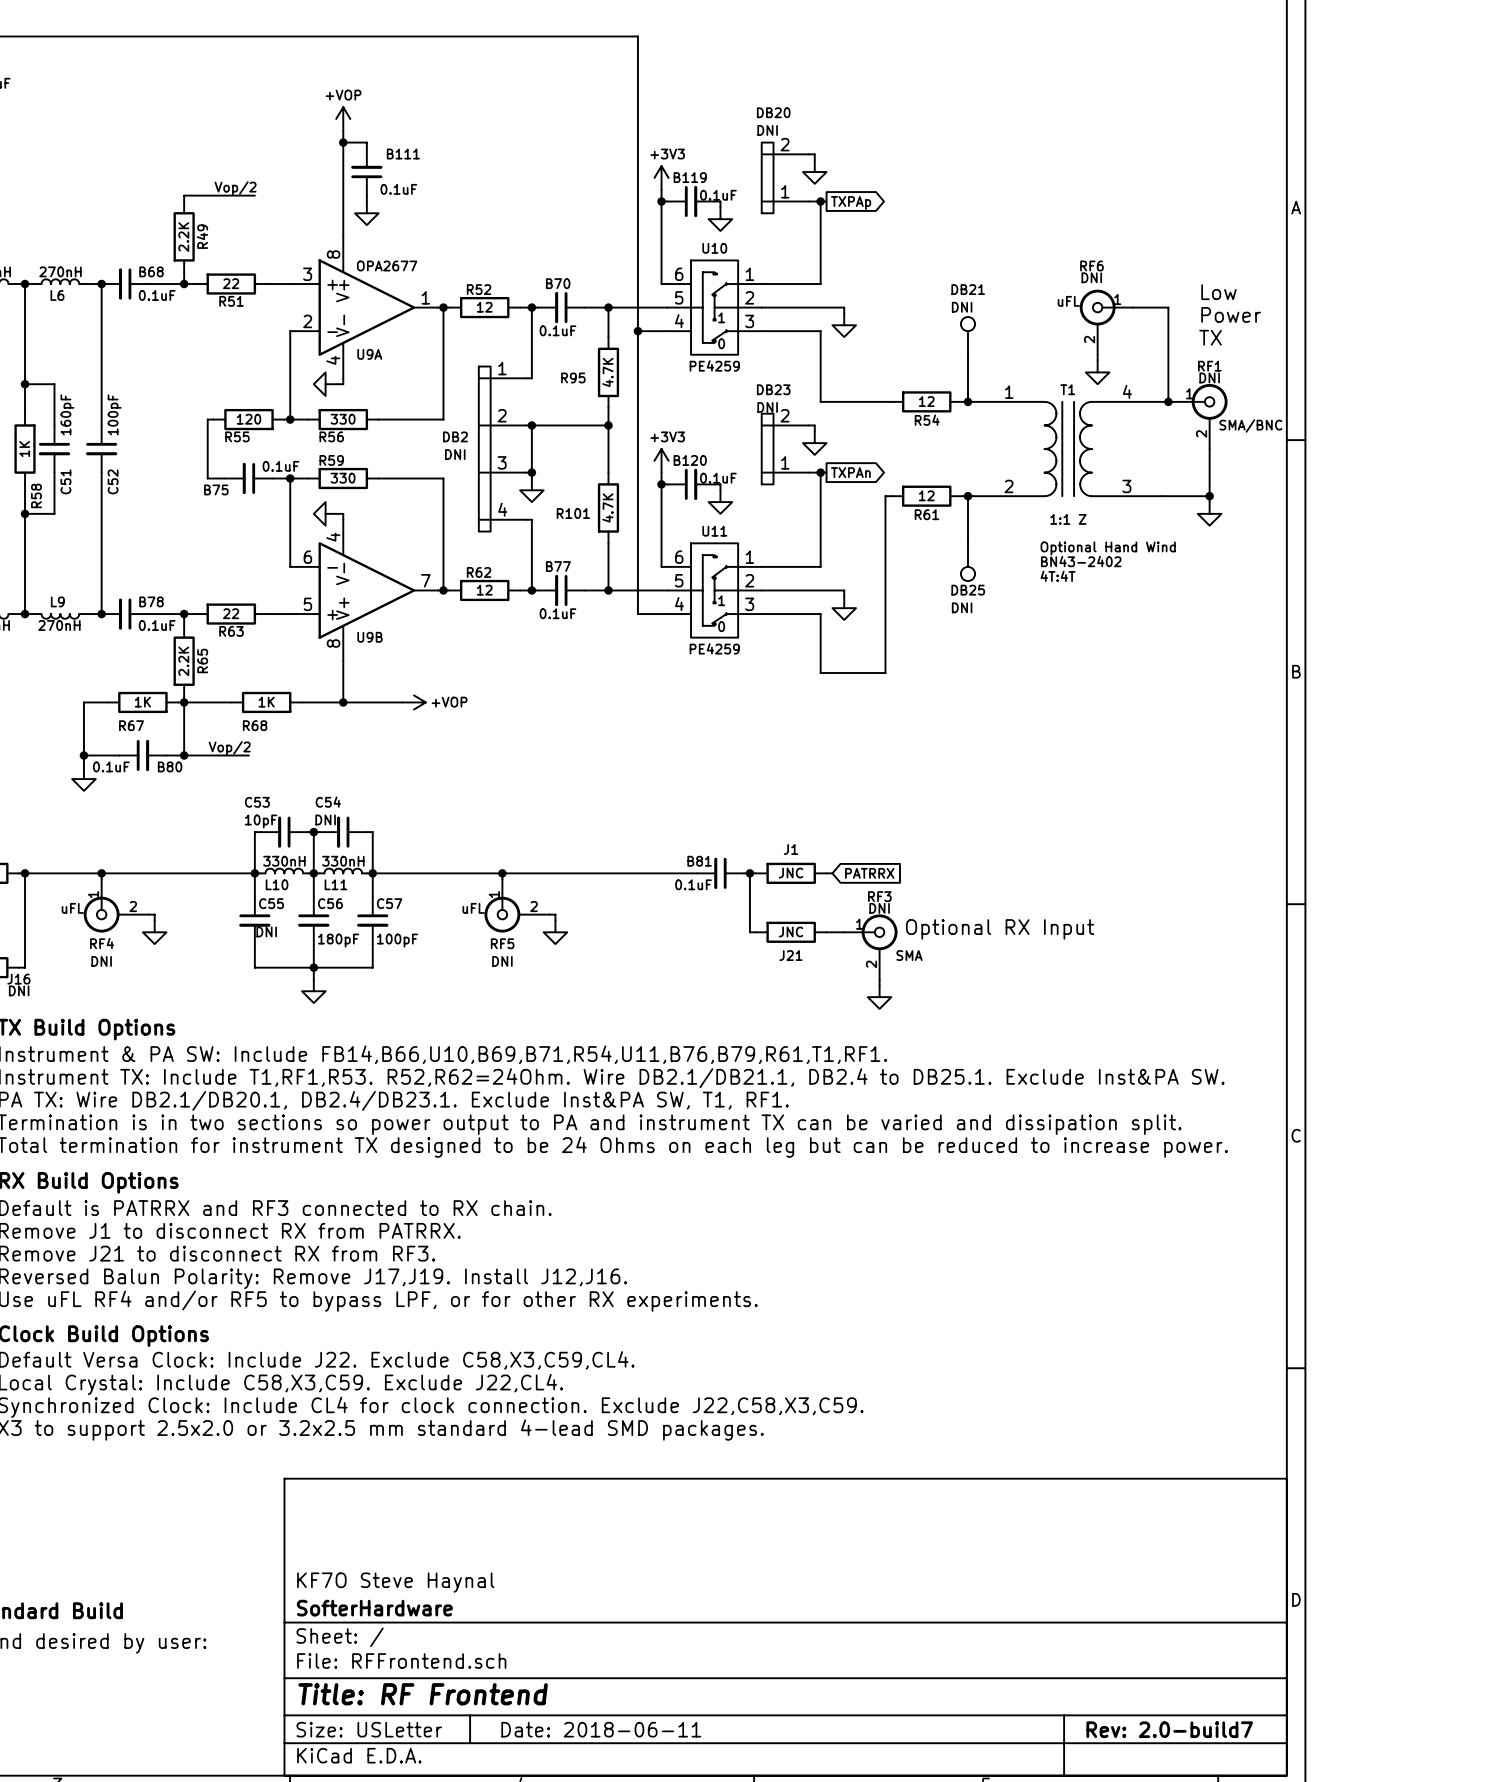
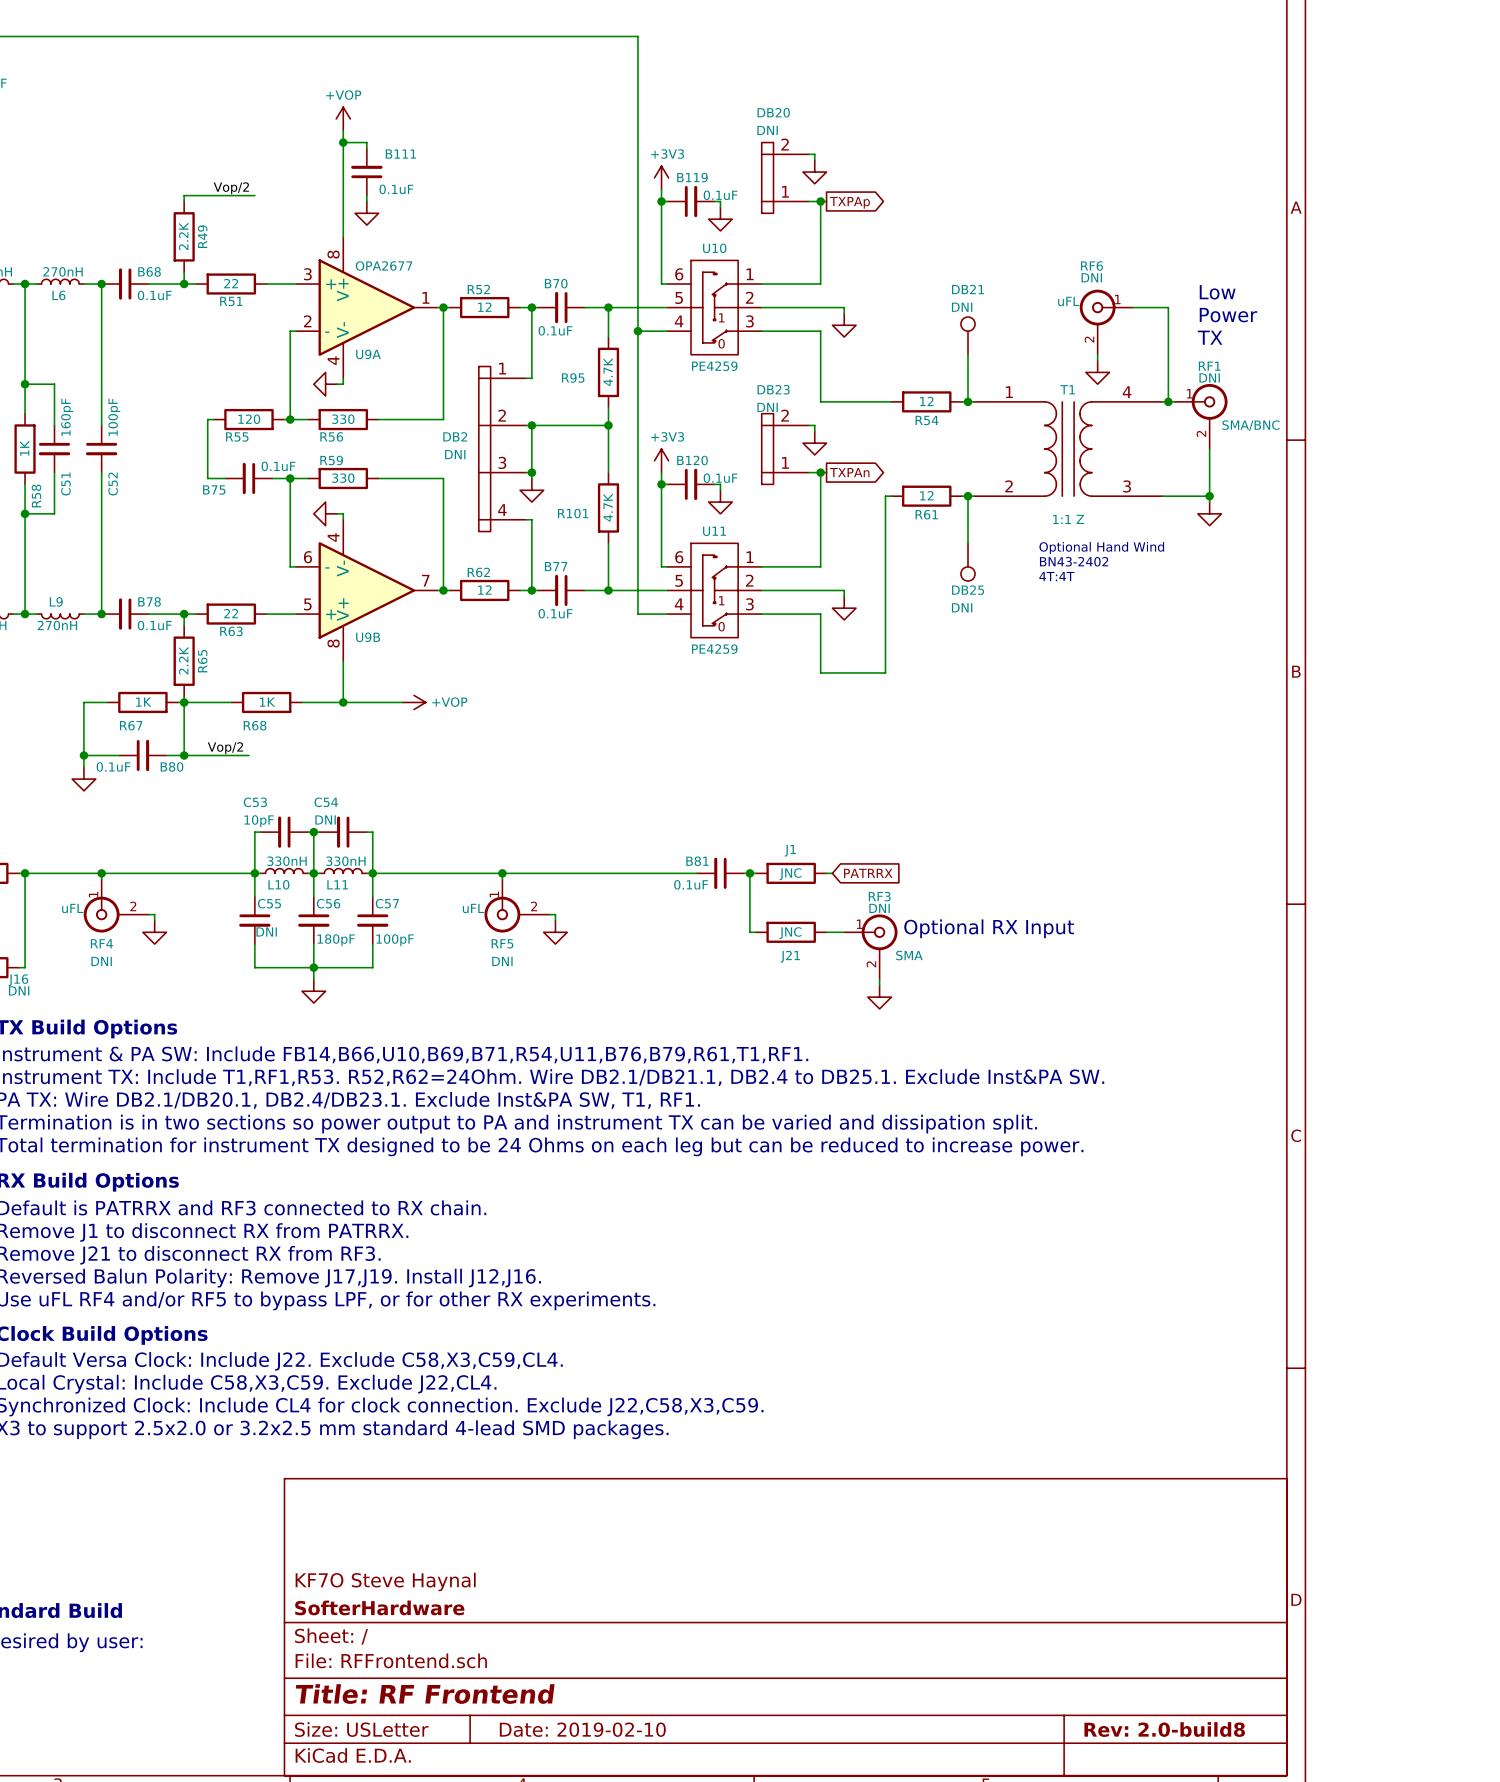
title block: Date: 2018-06-11 (601, 1729) -> Date: 2019-02-10 (582, 1729)
title block: Rev: 2.0-build7 (1169, 1729) -> Rev: 2.0-build8 (1164, 1729)

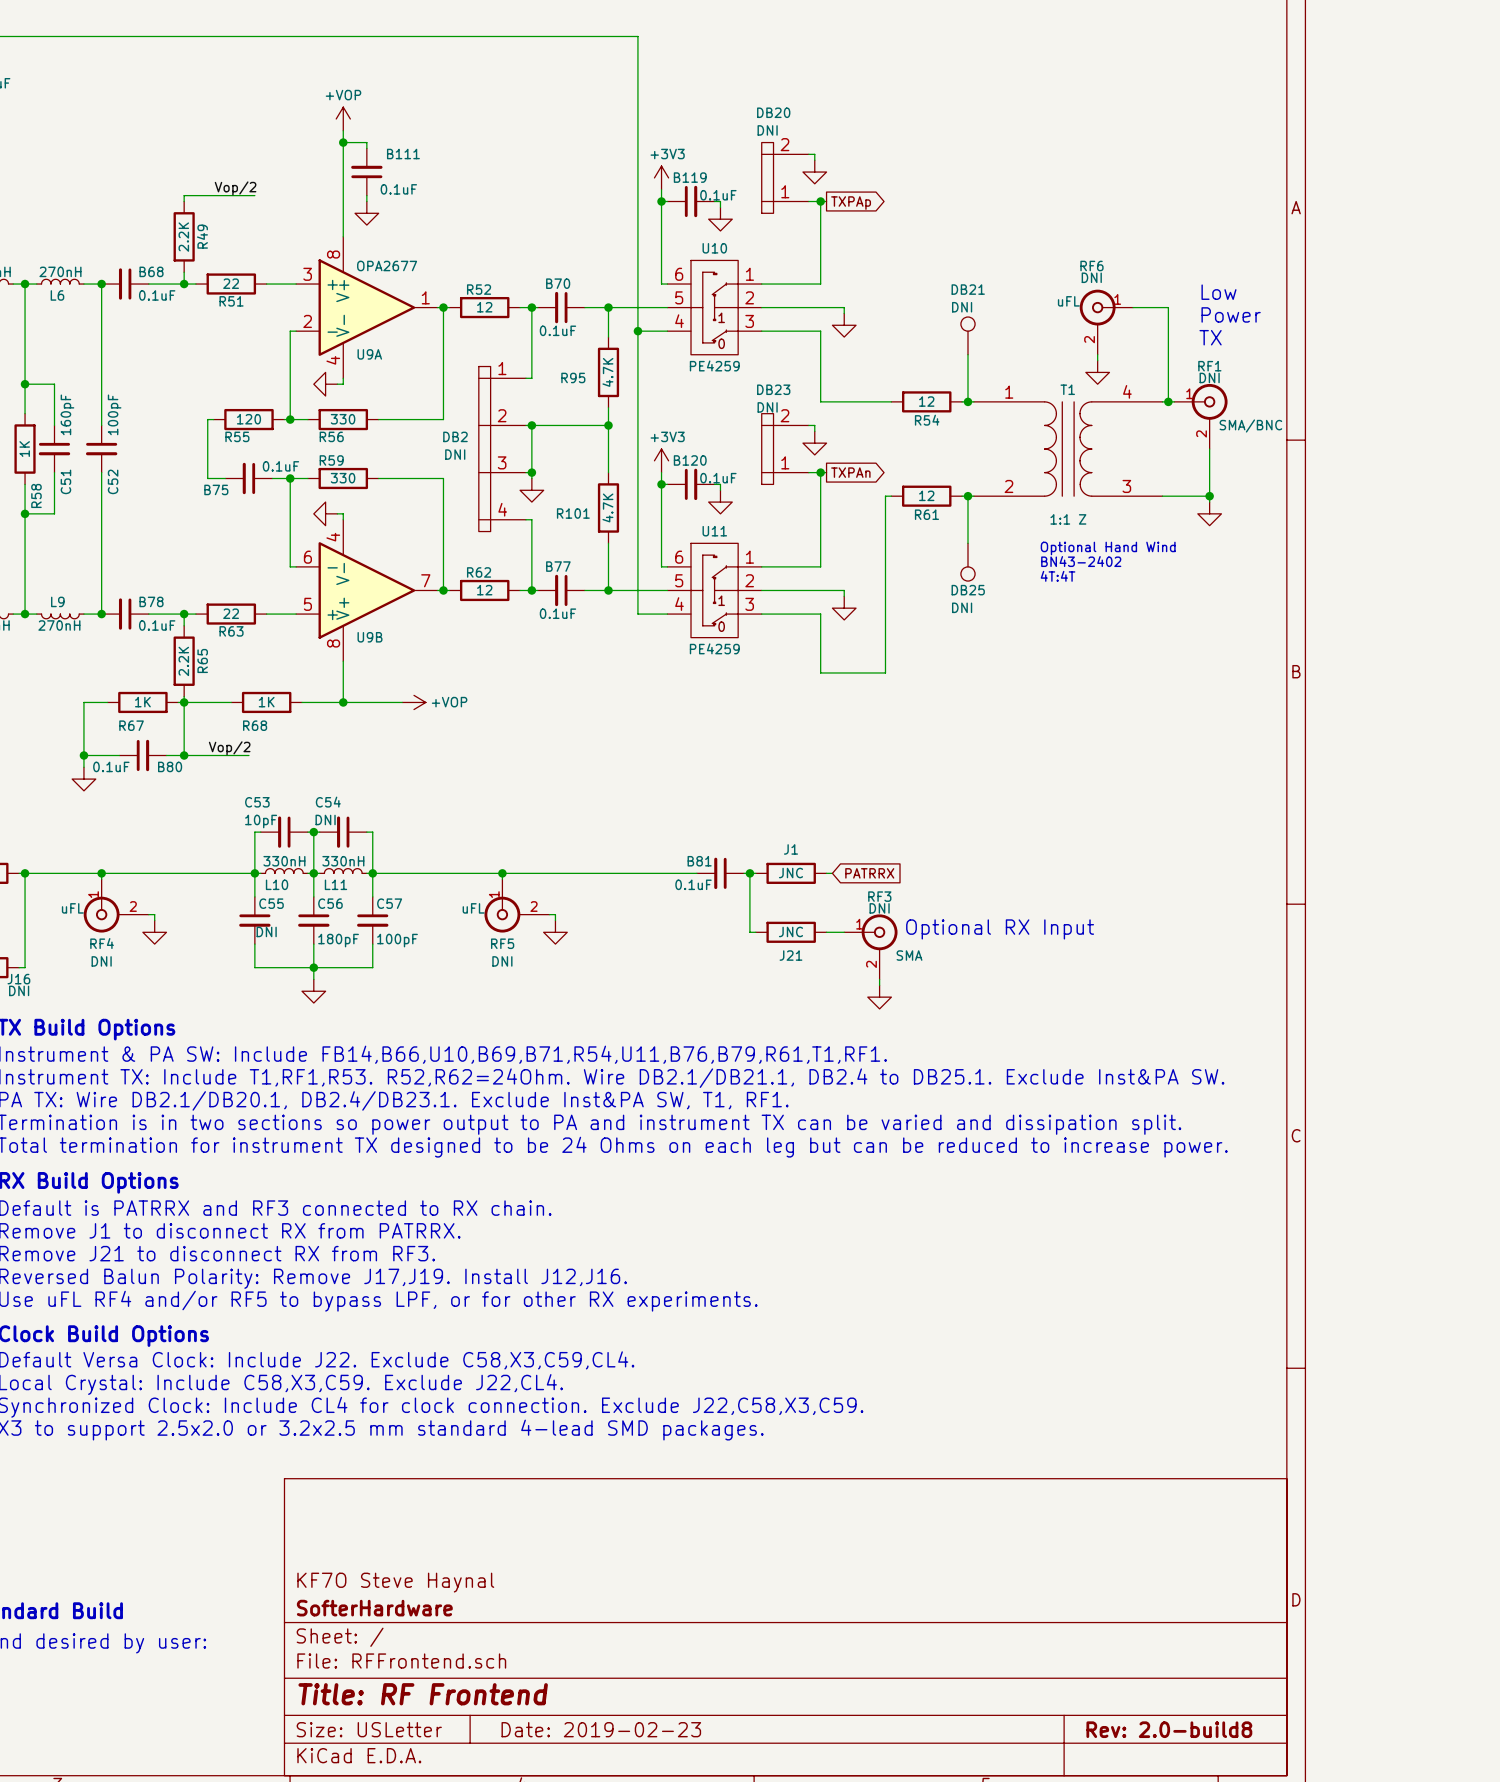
title block: Date: 2019-02-10 (582, 1729) -> Date: 2019-02-23 (601, 1729)

